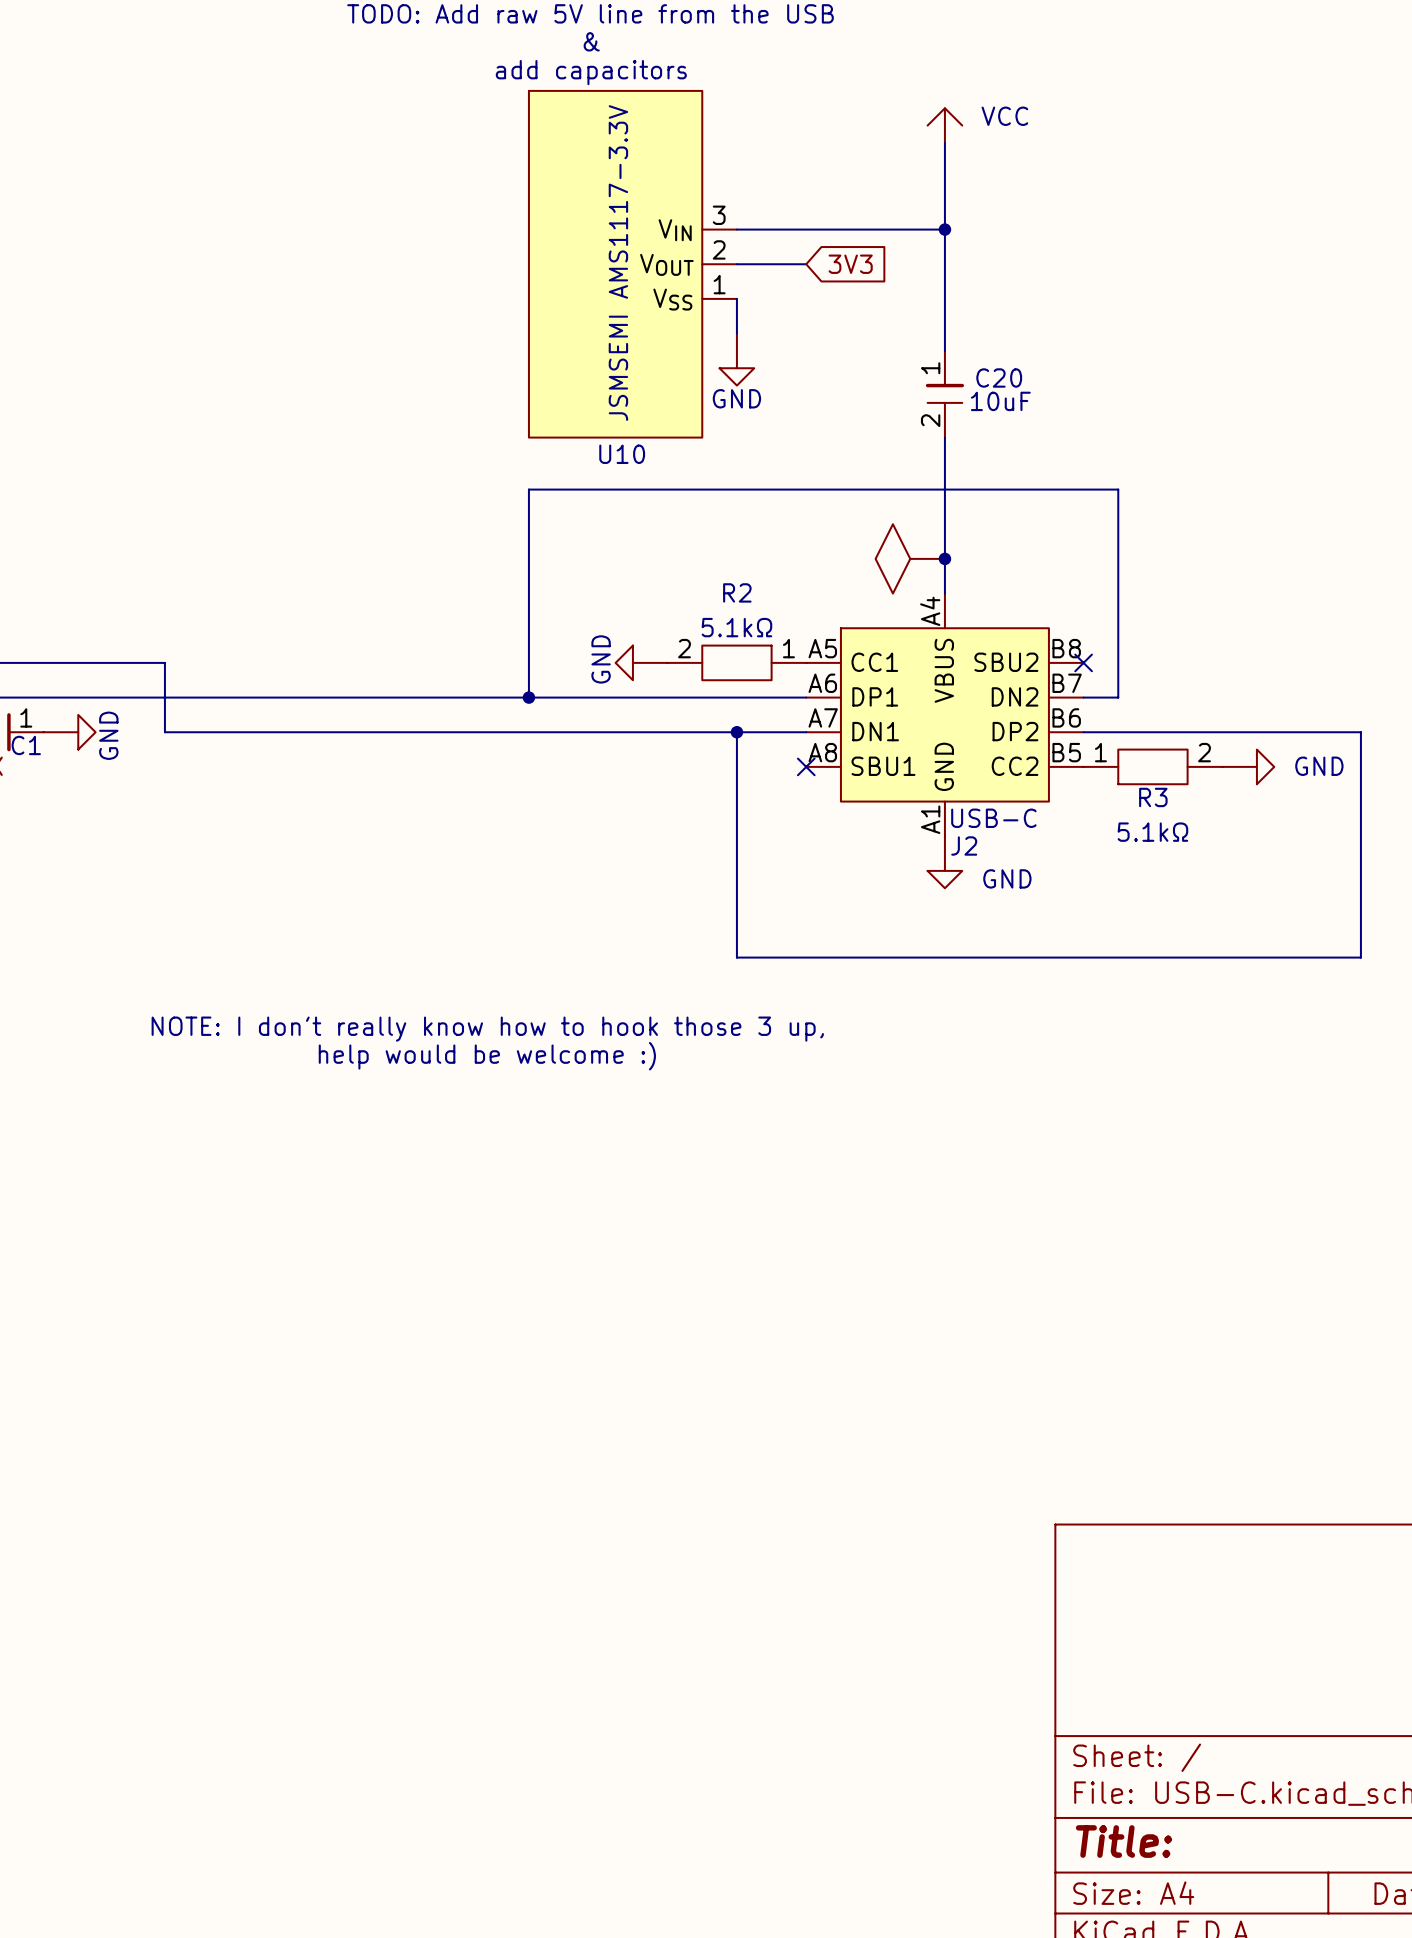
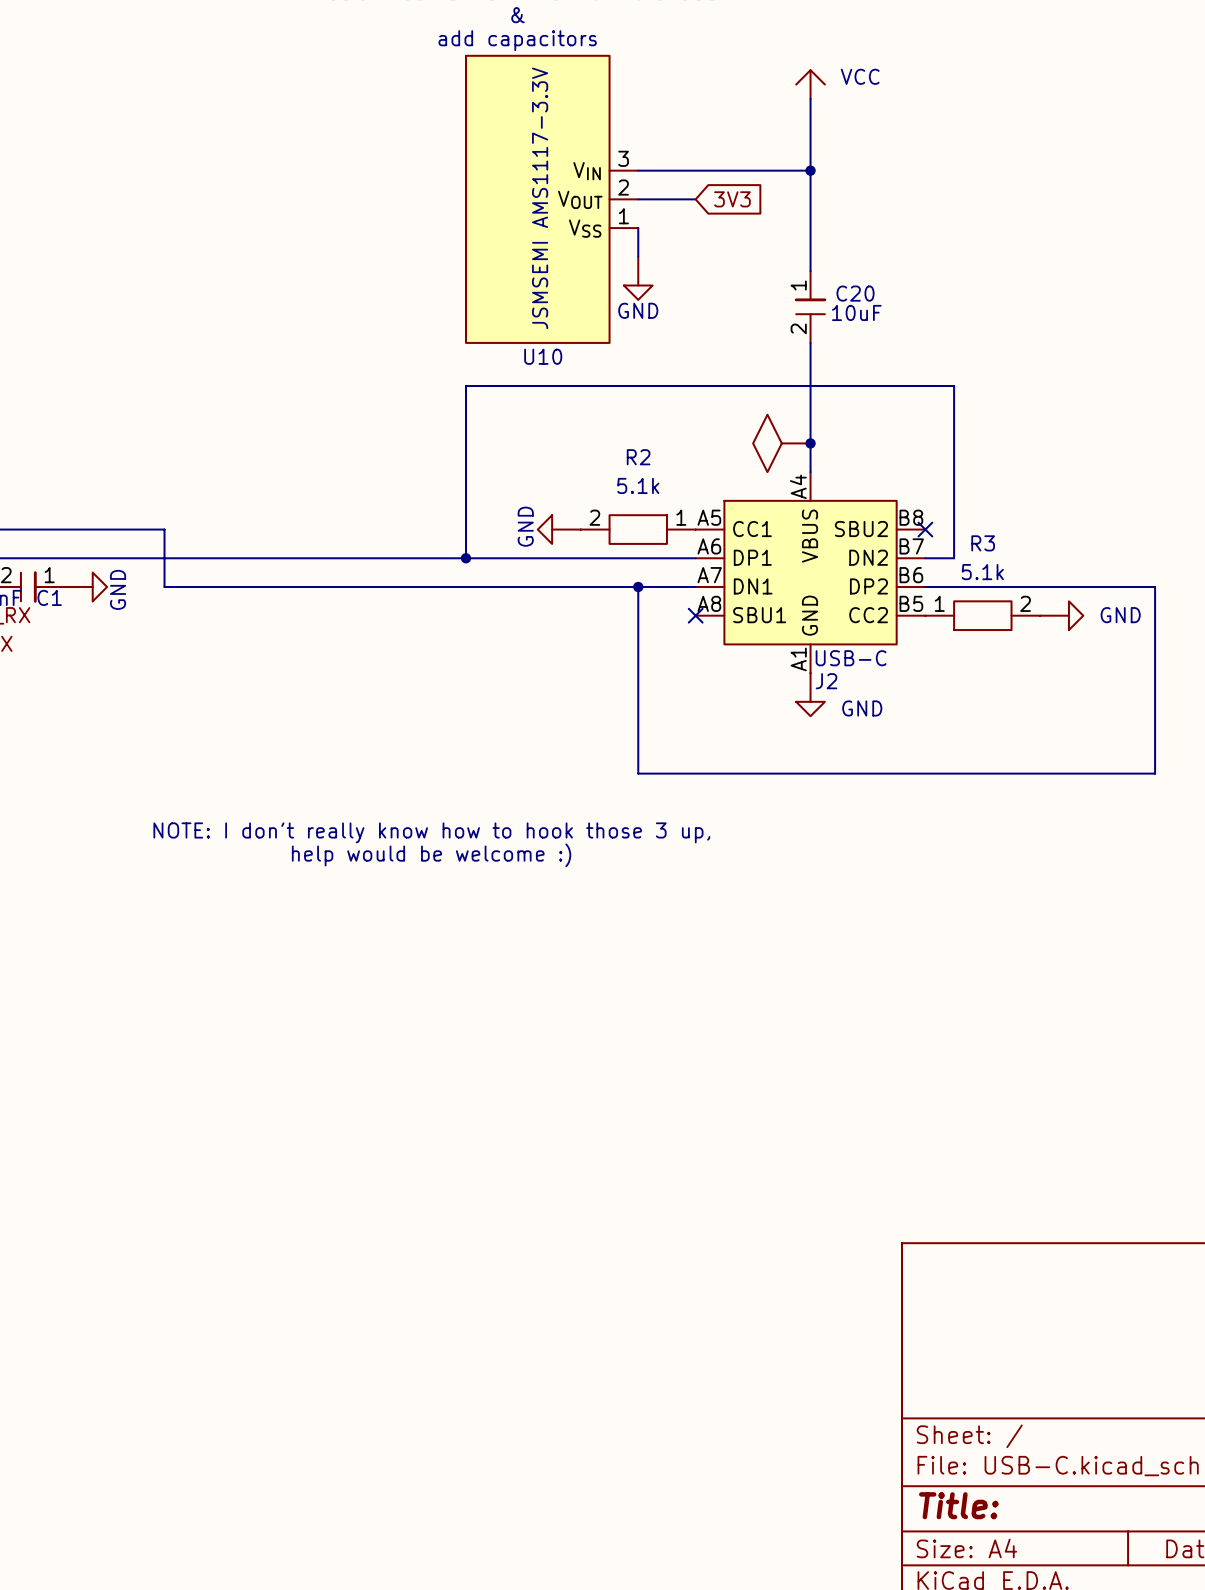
R2 name position: R2 (737, 592) -> R2 (638, 457)
R2 value: 5.1kΩ (736, 627) -> 5.1k (638, 485)
R3 name position: R3 (1153, 797) -> R3 (983, 543)
R3 value: 5.1kΩ (1152, 832) -> 5.1k (982, 572)

